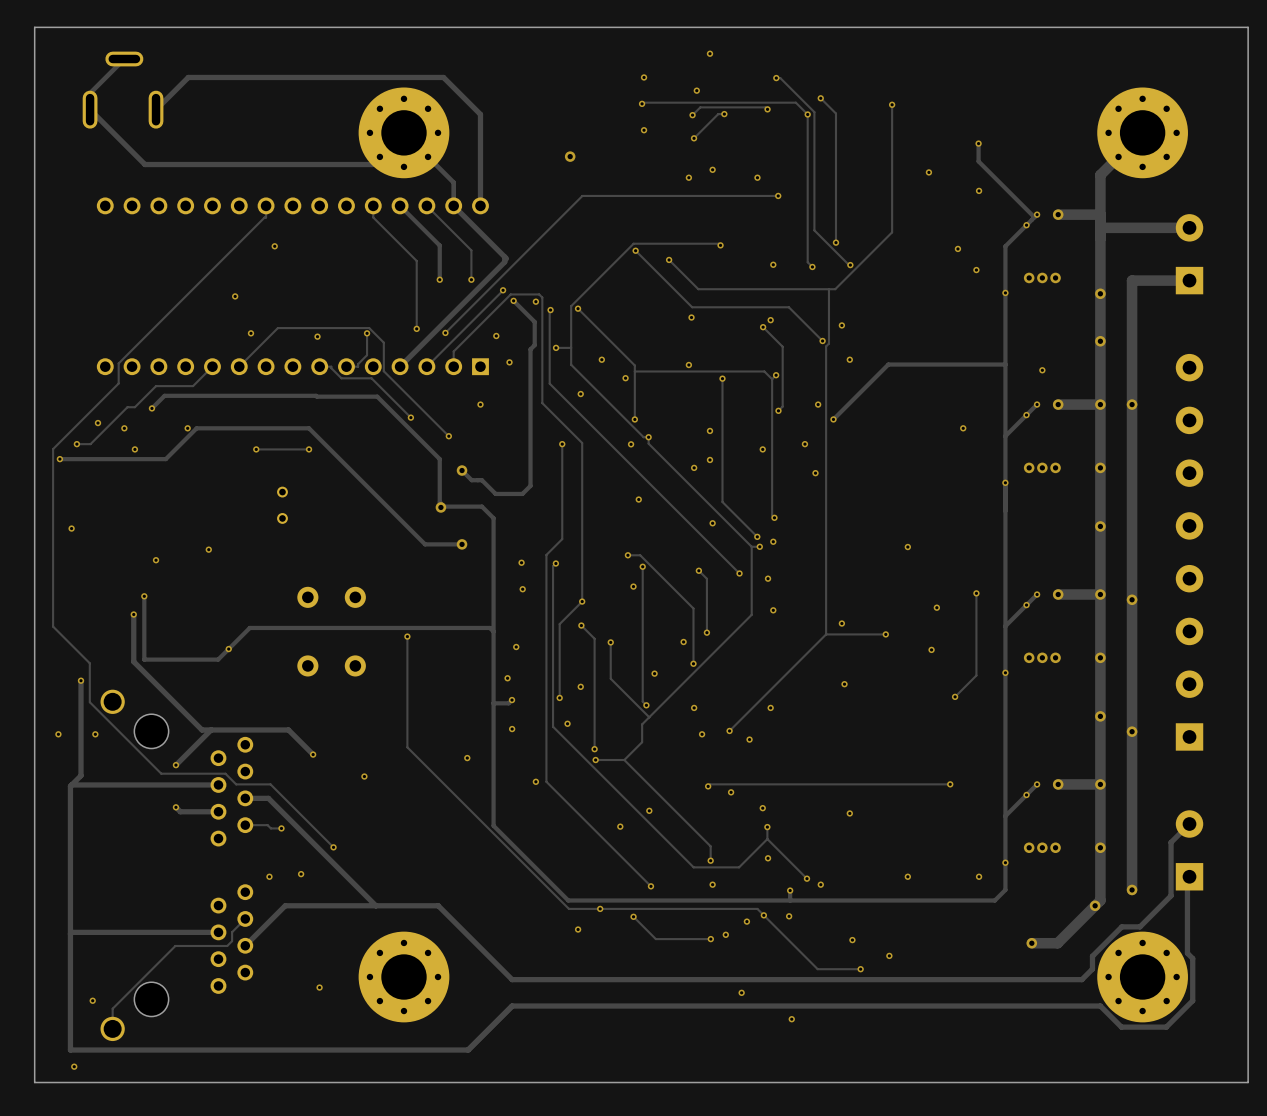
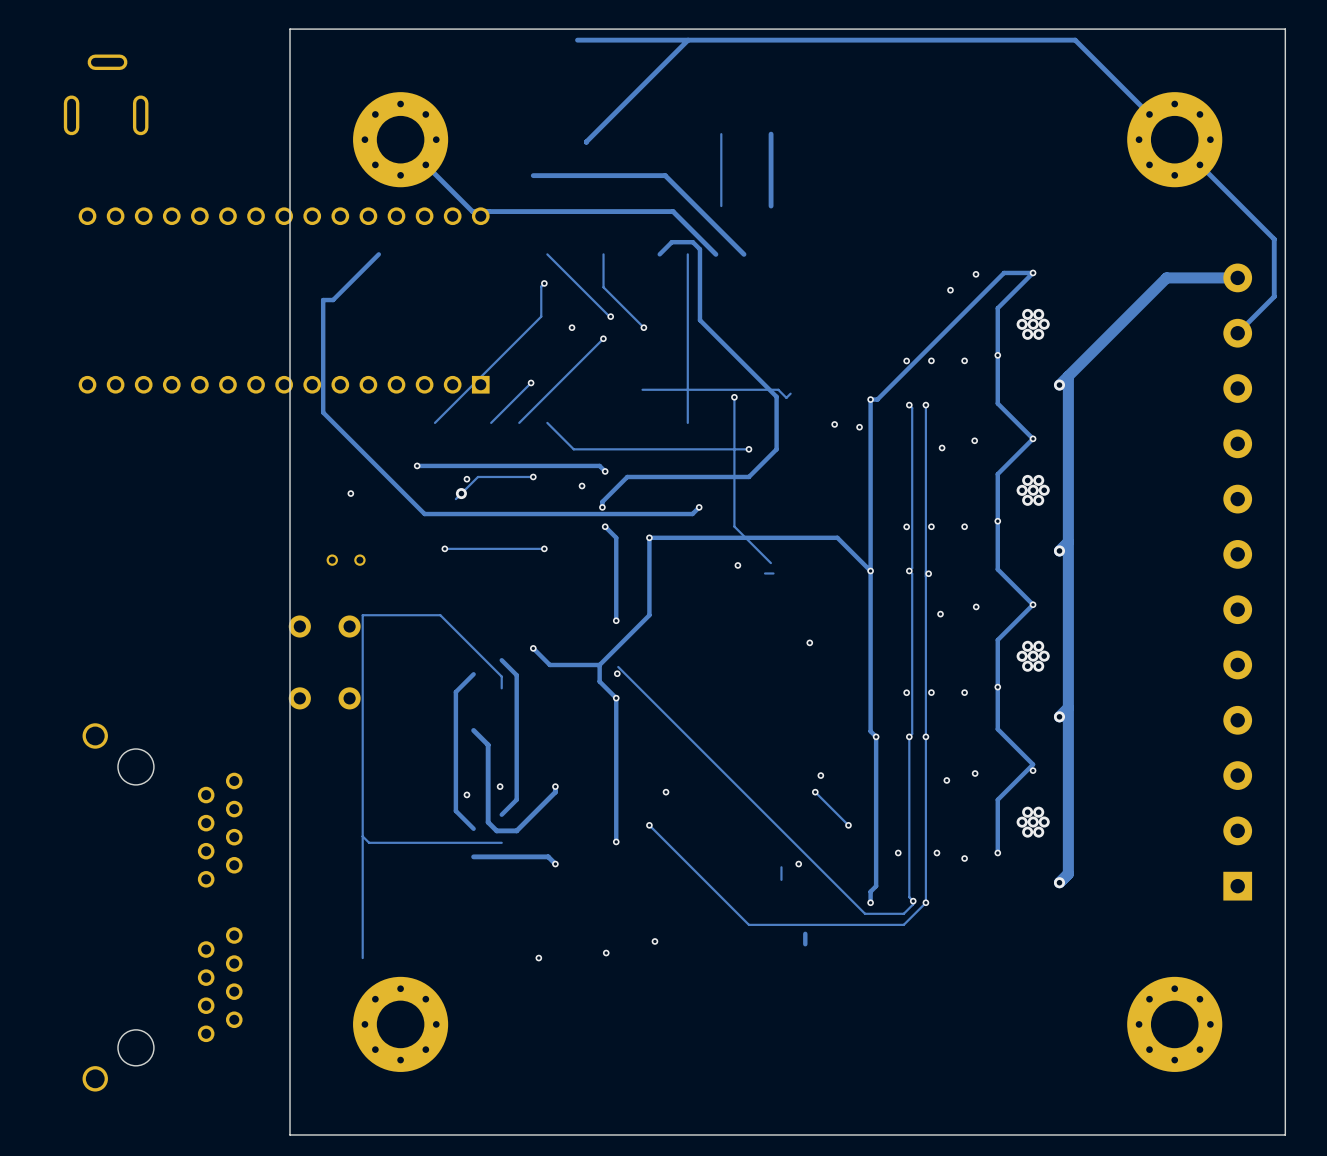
board edge: (298, 27) (34, 27) (34, 1082) (298, 1082) -> (290, 29) (290, 1135)
track: none -> (577, 40) (1075, 40) (1274, 239) (1274, 296) (1237, 333)
track: none -> (688, 40) (586, 142)
via: (709, 53) -> none
track: (124, 59) (90, 93) (90, 109) (144, 164) (372, 164) (403, 132) -> none
via: (644, 77) -> none
track: (776, 78) (780, 78) (814, 112) (814, 230) (850, 265) -> none
via: (776, 78) -> none
via: (696, 90) -> none
track: (820, 98) (835, 113) (835, 242) -> none
via: (820, 98) -> none
track: (642, 103) (795, 102) (807, 114) (807, 262) (812, 266) -> none
via: (642, 103) -> none
track: (892, 104) (892, 232) (835, 289) (698, 289) (669, 259) -> none
via: (892, 104) -> none
track: (156, 109) (188, 77) (443, 77) (480, 114) (480, 205) -> none
track: (767, 109) (765, 107) (700, 107) (692, 115) -> none
via: (767, 109) -> none
track: (724, 114) (718, 114) (694, 138) -> none
via: (724, 114) -> none
via: (807, 114) -> none
via: (692, 115) -> none
track: none -> (721, 134) (721, 206)
track: none -> (771, 134) (771, 206)
via: (644, 130) -> none
track: (1142, 132) (1100, 175) (1100, 900) (1057, 943) (1031, 943) -> none
via: (694, 138) -> none
track: (978, 143) (978, 161) (1034, 217) -> none
via: (978, 143) -> none
via: (570, 156) -> none
track: none -> (533, 175) (665, 175) (743, 254)
via: (712, 169) -> none
via: (928, 172) -> none
via: (688, 177) -> none
via: (757, 177) -> none
track: (453, 182) (453, 205) (506, 258) -> (452, 191) (472, 211) (673, 211) (715, 254)
via: (979, 190) -> none
track: (778, 195) (582, 195) (445, 332) -> none
via: (778, 195) -> none
track: (266, 205) (266, 217) (118, 363) (118, 383) (53, 449) (53, 626) (89, 663) (89, 702) (161, 773) (225, 773) (236, 784) (270, 784) (333, 847) -> none
track: (373, 205) (373, 217) (416, 260) (416, 328) -> none
track: (400, 205) (439, 245) (439, 279) -> none
track: (426, 205) (471, 250) (471, 279) -> none
track: (1037, 214) (1005, 246) (1005, 889) (994, 900) (568, 900) (493, 825) (493, 518) (481, 506) (440, 507) (439, 459) (377, 396) (164, 395) (151, 408) -> none
via: (1037, 214) -> none
via: (1058, 214) -> none
track: (1100, 214) (1058, 214) -> none
via: (1026, 225) -> none
track: (1189, 227) (1100, 227) -> none
track: none -> (378, 254) (333, 300) (323, 300) (323, 412) (424, 514) (692, 514) (699, 507)
track: none -> (547, 254) (610, 316)
track: none -> (603, 254) (603, 287) (643, 327)
track: none -> (659, 254) (671, 242) (692, 242) (699, 249) (699, 320) (776, 396) (776, 449) (748, 476) (627, 476) (602, 501) (602, 507)
track: none -> (687, 254) (687, 422)
via: (835, 242) -> none
track: (720, 245) (718, 243) (633, 243) (571, 306) (571, 364) (643, 437) (648, 437) (648, 443) (751, 546) (751, 614) (649, 717) -> none
via: (720, 245) -> none
via: (274, 246) -> none
via: (957, 248) -> none
track: (635, 250) (692, 307) (788, 307) (822, 340) -> none
via: (635, 250) -> none
part: (1189, 254) -> none
track: (504, 256) (504, 262) (400, 366) (403, 366) -> none
via: (669, 259) -> none
via: none -> (1033, 272)
via: none -> (976, 274)
via: (773, 264) -> none
track: none -> (1237, 277) (1166, 277) (1059, 385)
via: (850, 265) -> none
via: (812, 266) -> none
track: none -> (544, 283) (541, 286) (541, 316) (434, 422)
via: none -> (544, 283)
via: (976, 270) -> none
via: none -> (950, 290)
via: (1029, 277) -> none
via: (1042, 277) -> none
via: (1055, 277) -> none
via: (439, 279) -> none
via: (471, 279) -> none
track: (1189, 280) (1132, 280) (1132, 889) -> none
track: (828, 289) (828, 343) (826, 346) (826, 634) -> none
track: (503, 290) (426, 366) -> none
via: (503, 290) -> none
via: (1005, 292) -> none
via: (1100, 293) -> none
via: (235, 296) -> none
via: none -> (1027, 314)
via: none -> (1038, 314)
track: (513, 300) (534, 321) (534, 345) (530, 349) (530, 485) (522, 493) (495, 493) (481, 480) (471, 480) (462, 470) -> none
via: (513, 300) -> none
via: (535, 301) -> none
via: none -> (610, 316)
track: (578, 308) (634, 365) (634, 419) -> none
via: (578, 308) -> none
via: none -> (1033, 324)
via: none -> (1044, 324)
via: none -> (1022, 324)
track: (550, 310) (549, 383) (739, 573) -> none
via: (550, 310) -> none
via: none -> (572, 327)
via: none -> (643, 327)
via: (691, 317) -> none
via: none -> (1027, 334)
via: none -> (1038, 334)
via: (770, 320) -> none
track: none -> (603, 338) (519, 422)
via: none -> (603, 338)
via: (841, 325) -> none
track: (763, 327) (782, 346) (782, 406) (778, 410) -> none
via: (763, 327) -> none
via: (416, 328) -> none
via: (445, 332) -> none
via: (250, 333) -> none
track: (367, 333) (367, 355) (358, 364) (358, 366) (346, 366) -> none
via: (367, 333) -> none
via: (496, 335) -> none
via: (317, 336) -> none
via: none -> (997, 355)
via: (822, 340) -> none
via: (1100, 341) -> none
via: none -> (931, 360)
via: none -> (964, 360)
via: none -> (906, 360)
via: (556, 347) -> none
track: (571, 347) (556, 347) -> none
track: none -> (1068, 376) (1068, 873) (1059, 882)
via: (601, 359) -> none
via: (849, 359) -> none
via: (509, 362) -> none
track: (1005, 364) (888, 364) (833, 419) -> none
track: none -> (531, 382) (491, 422)
via: none -> (531, 382)
via: (688, 365) -> none
track: (212, 366) (193, 386) (156, 386) (134, 407) (127, 407) (90, 444) (76, 444) -> none
track: (239, 366) (277, 328) (369, 328) (383, 342) (383, 371) -> none
track: (319, 366) (331, 366) (341, 378) (371, 378) (410, 417) -> none
track: (453, 366) (453, 351) (510, 294) (539, 294) (542, 297) (542, 403) (582, 443) (582, 601) (559, 624) (559, 697) -> none
via: none -> (1059, 385)
via: (1042, 370) -> none
track: (383, 371) (448, 436) -> none
via: (776, 375) -> none
via: (625, 378) -> none
track: (772, 379) (772, 515) (774, 517) -> none
via: none -> (870, 399)
track: none -> (909, 405) (912, 407) (912, 568) (909, 570) (912, 573) (909, 897) (913, 901) (913, 904) (903, 913) (865, 913) (618, 667)
via: none -> (909, 405)
track: none -> (925, 405) (925, 902) (903, 924) (748, 924) (649, 825)
via: none -> (925, 405)
via: (580, 394) -> none
track: none -> (547, 422) (573, 449) (748, 449)
via: (480, 404) -> none
track: (1037, 404) (1005, 436) -> none
via: (1037, 404) -> none
via: (1058, 404) -> none
track: (1100, 404) (1058, 404) -> none
via: (1100, 404) -> none
via: (1132, 404) -> none
via: (151, 408) -> none
via: (778, 410) -> none
via: (1026, 415) -> none
via: (410, 417) -> none
via: none -> (1033, 438)
via: (634, 419) -> none
via position: (833, 419) -> (859, 427)
via: (97, 423) -> none
via: none -> (942, 447)
via: (124, 428) -> none
via: (187, 428) -> none
via: none -> (748, 449)
via position: (963, 428) -> (974, 440)
via: (709, 430) -> none
via: (448, 436) -> none
via: (648, 437) -> none
via: (76, 444) -> none
track: none -> (417, 465) (599, 465) (605, 471)
via: none -> (417, 465)
track: (562, 444) (562, 539) (546, 554) (546, 781) (650, 886) -> none
via: (562, 444) -> none
via: (631, 444) -> none
via: (804, 444) -> none
via: (134, 449) -> none
via: (256, 449) -> none
track: (309, 449) (256, 449) -> none
via: (309, 449) -> none
via: none -> (605, 471)
via: (762, 449) -> none
track: none -> (533, 476) (478, 476) (455, 499)
via: none -> (533, 476)
via: none -> (466, 479)
via: none -> (1027, 480)
via: none -> (1038, 480)
track: (59, 459) (165, 459) (196, 428) (309, 428) (425, 544) (462, 544) -> none
via: (59, 459) -> none
via: (709, 459) -> none
via: none -> (582, 486)
via: (694, 467) -> none
via: none -> (1022, 490)
via: none -> (1033, 490)
via: none -> (1044, 490)
via: (1029, 467) -> none
via: (1042, 467) -> none
via: (1055, 467) -> none
via: (1100, 467) -> none
via: none -> (350, 493)
via: (815, 473) -> none
via: none -> (1027, 500)
via: none -> (1038, 500)
via: (1005, 482) -> none
via: none -> (602, 507)
via: none -> (699, 507)
via: none -> (997, 521)
via position: (638, 499) -> (649, 537)
track: none -> (605, 526) (616, 537) (616, 620)
via: none -> (605, 526)
via: none -> (906, 526)
via: none -> (931, 526)
via: none -> (964, 526)
part rotation: 0° (282, 505) -> 90° clockwise (346, 560)
part position: (282, 505) -> (346, 560)
via: (440, 507) -> none
via: (774, 517) -> none
via: none -> (444, 548)
track: none -> (544, 548) (444, 548)
via: none -> (544, 548)
via: (712, 523) -> none
via: none -> (1059, 550)
via: (1100, 526) -> none
via: (71, 528) -> none
via: (757, 536) -> none
via: none -> (737, 565)
via: (773, 541) -> none
via: (462, 544) -> none
track: none -> (870, 570) (837, 537) (649, 537) (649, 615) (599, 664)
via: none -> (870, 570)
via: none -> (909, 570)
via: (759, 546) -> none
via: (208, 549) -> none
part: (1189, 552) -> none
part: none -> (1237, 582)
track: (627, 555) (640, 555) (693, 608) (693, 663) -> none
via: (627, 555) -> none
via: (156, 560) -> none
via: (521, 562) -> none
track: (555, 563) (553, 566) (553, 726) (693, 867) (739, 867) (767, 839) (806, 878) -> none
via: (555, 563) -> none
track: (642, 566) (642, 701) (646, 705) -> none
via: (642, 566) -> none
track: (698, 570) (706, 578) (706, 632) -> none
via: (698, 570) -> none
via: (739, 573) -> none
via: none -> (1033, 604)
via: (768, 578) -> none
via: none -> (976, 606)
via: none -> (940, 614)
via: (633, 586) -> none
via: (522, 589) -> none
via: none -> (616, 620)
track: (976, 593) (976, 675) (955, 696) -> none
via: (976, 593) -> none
track: (1037, 594) (1005, 626) -> none
via: (1037, 594) -> none
via: (1058, 594) -> none
track: (1100, 594) (1058, 594) -> none
via: (1100, 594) -> none
track: (144, 596) (144, 659) (218, 659) (249, 627) (489, 627) (493, 631) -> none
via: (144, 596) -> none
via: (1132, 599) -> none
via: (582, 601) -> none
via: (1026, 605) -> none
via: (936, 607) -> none
via position: (773, 610) -> (809, 642)
track: (133, 614) (133, 661) (202, 729) (288, 729) (313, 754) -> none
via: (133, 614) -> none
via: none -> (1027, 646)
via: none -> (1038, 646)
track: none -> (533, 648) (549, 664) (599, 664)
via: none -> (533, 648)
via: (841, 623) -> none
track: (581, 625) (594, 638) (594, 749) -> none
via: (581, 625) -> none
via: none -> (1022, 656)
via: none -> (1033, 656)
via: none -> (1044, 656)
track: none -> (501, 660) (516, 675) (516, 799) (501, 814)
via: (706, 632) -> none
track: none -> (599, 664) (599, 681) (616, 698) (616, 841)
track: (826, 634) (729, 730) -> none
track: (885, 634) (826, 634) -> none
via: (885, 634) -> none
via: none -> (1027, 666)
via: none -> (1038, 666)
track: (407, 636) (407, 747) (568, 908) (757, 908) (817, 969) (860, 969) -> none
via: (407, 636) -> none
via: (683, 641) -> none
track: none -> (473, 674) (455, 692) (455, 811) (473, 828)
track: (610, 642) (610, 678) (649, 717) -> none
via: (516, 647) -> none
via: (228, 649) -> none
via: (931, 649) -> none
via: none -> (997, 687)
track: none -> (501, 688) (501, 676) (440, 615) (362, 615) (362, 958)
via: (1029, 657) -> none
via: (1042, 657) -> none
via: (1055, 657) -> none
via: (1100, 657) -> none
via: none -> (906, 692)
via: none -> (931, 692)
via: none -> (964, 692)
via: (693, 663) -> none
via: none -> (616, 698)
via: (1005, 672) -> none
via: (654, 673) -> none
via: (507, 678) -> none
track: (81, 680) (81, 775) (70, 786) (70, 1050) (468, 1050) (512, 1006) (1100, 1006) (1121, 1027) (1166, 1027) (1192, 1000) (1192, 958) (1187, 953) (1187, 878) (1189, 876) -> none
via: (81, 680) -> none
via: none -> (1059, 716)
via position: (844, 684) -> (876, 736)
via: (580, 686) -> none
track: none -> (473, 730) (488, 744) (488, 822) (496, 830) (516, 830) (555, 792) (555, 786)
via: (955, 696) -> none
via: (559, 697) -> none
track: (512, 700) (508, 703) (493, 703) -> none
via: (512, 700) -> none
via: none -> (909, 736)
via: none -> (925, 736)
via: (646, 705) -> none
via: (694, 707) -> none
via: (770, 707) -> none
via: (1100, 716) -> none
track: (649, 717) (642, 724) (642, 742) (624, 760) -> none
via: (567, 723) -> none
track: (211, 729) (175, 765) -> none
via: (512, 729) -> none
via: (729, 730) -> none
via: (1132, 731) -> none
via: (58, 734) -> none
via: (95, 734) -> none
via: (702, 734) -> none
via: none -> (1033, 770)
via: none -> (975, 773)
via: (749, 739) -> none
via: none -> (820, 775)
via: none -> (946, 780)
via: (594, 749) -> none
via: none -> (500, 786)
via: none -> (555, 786)
via: (313, 754) -> none
via: none -> (666, 792)
track: none -> (815, 792) (848, 825)
via: none -> (815, 792)
via: (595, 760) -> none
track: (624, 760) (710, 846) (710, 860) -> none
track: (624, 760) (595, 760) -> none
via: (175, 765) -> none
via: none -> (1027, 812)
via: none -> (1038, 812)
via: (364, 776) -> none
via: (535, 781) -> none
via: none -> (1033, 822)
via: none -> (1044, 822)
track: (218, 784) (71, 784) -> none
track: (950, 784) (710, 784) (708, 786) -> none
via: (950, 784) -> none
via: none -> (1022, 822)
track: (1037, 784) (1005, 816) -> none
via: (1037, 784) -> none
via: (1058, 784) -> none
track: (1100, 784) (1058, 784) -> none
via: (1100, 784) -> none
via: (708, 786) -> none
via: none -> (649, 825)
via: none -> (848, 825)
via: (731, 792) -> none
via: none -> (1027, 832)
via: none -> (1038, 832)
via: (1026, 794) -> none
track: none -> (362, 836) (369, 842) (501, 842)
track: (245, 798) (268, 798) (375, 905) -> none
via: none -> (616, 841)
track: (175, 807) (180, 811) (218, 811) -> none
via: (175, 807) -> none
via: (762, 808) -> none
via: (649, 810) -> none
via: (849, 813) -> none
via: none -> (898, 852)
via: none -> (936, 852)
track: none -> (997, 852) (997, 799) (1033, 764) (997, 729) (997, 640) (1033, 604) (997, 569) (997, 474) (1033, 438) (997, 403) (997, 308) (1033, 272) (1004, 272) (877, 399) (870, 399) (870, 731) (876, 736) (876, 886) (870, 891) (870, 902)
via: none -> (997, 852)
track: none -> (473, 856) (548, 856) (555, 864)
via: none -> (964, 858)
via: none -> (555, 864)
via: none -> (798, 864)
track: (1189, 824) (1171, 842) (1171, 895) (1139, 926) (1121, 926) (1092, 956) (1092, 969) (1081, 979) (512, 979) (438, 905) (285, 905) (245, 945) -> none
track: (245, 825) (267, 825) (270, 828) (281, 828) -> none
via: (620, 826) -> none
via: (767, 827) -> none
via: (281, 828) -> none
via: none -> (1059, 882)
via: (333, 847) -> none
via: (1029, 847) -> none
via: (1042, 847) -> none
via: (1055, 847) -> none
via: (1100, 847) -> none
part: (1189, 850) -> none
via: (768, 858) -> none
via: none -> (913, 901)
via: (710, 860) -> none
via: none -> (870, 902)
via: none -> (925, 902)
via: (1005, 862) -> none
via: (301, 874) -> none
via: (269, 876) -> none
via: (907, 876) -> none
via: (979, 876) -> none
via: (806, 878) -> none
via: (712, 884) -> none
via: (820, 884) -> none
via: (650, 886) -> none
via: (1132, 889) -> none
via: (790, 890) -> none
via: none -> (654, 941)
via: (1095, 905) -> none
via: none -> (538, 958)
via: (763, 915) -> none
track: (633, 916) (655, 939) (710, 939) -> none
via: (633, 916) -> none
via: (789, 916) -> none
track: (245, 918) (232, 932) (232, 941) (227, 945) (175, 945) (112, 1008) (112, 1028) -> none
via: (746, 921) -> none
via: (578, 929) -> none
track: (218, 932) (72, 932) (70, 933) -> none
via: (725, 934) -> none
via: (710, 939) -> none
via: (852, 940) -> none
via: (1031, 943) -> none
via: (889, 955) -> none
via: (860, 969) -> none
via: (319, 987) -> none
via: (741, 992) -> none
via: (92, 1000) -> none
via: (791, 1019) -> none
via: (74, 1066) -> none

